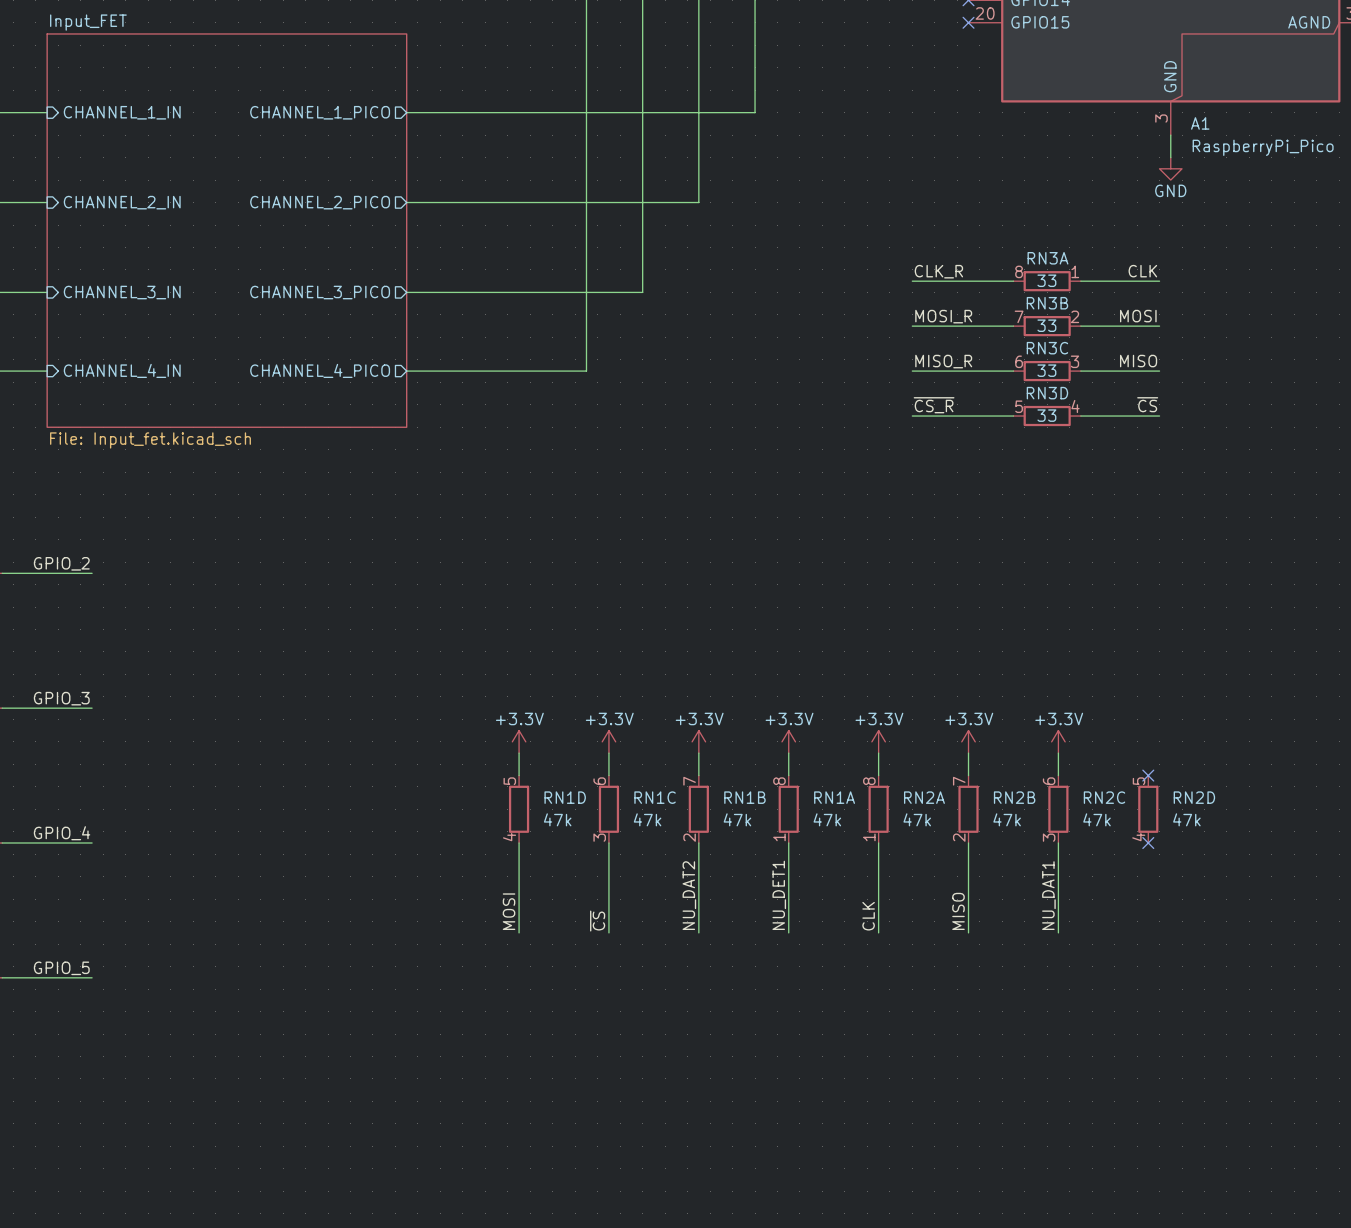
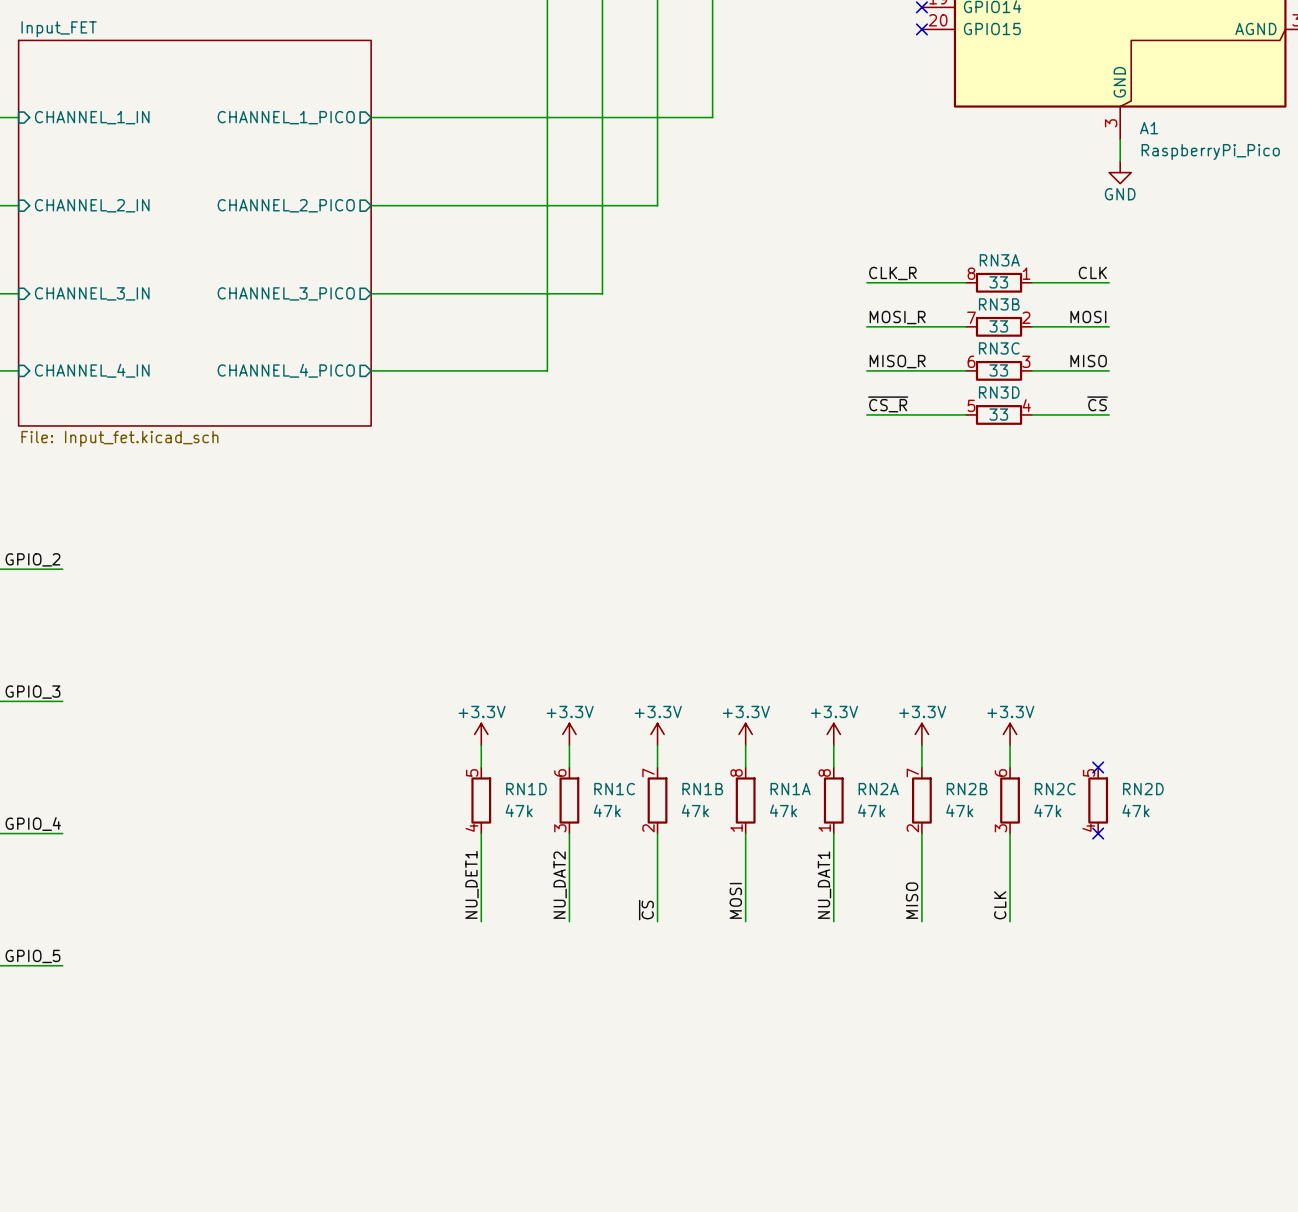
label: NU_DAT2 (689, 895) -> ~{CS} (646, 910)
label: NU_DET1 (779, 895) -> MOSI (735, 900)
label: NU_DAT1 (1048, 895) -> CLK (1000, 905)
label: MOSI (509, 911) -> NU_DET1 (471, 884)
label: CLK (868, 916) -> NU_DAT1 (824, 885)
label: ~{CS} (597, 921) -> NU_DAT2 (560, 885)

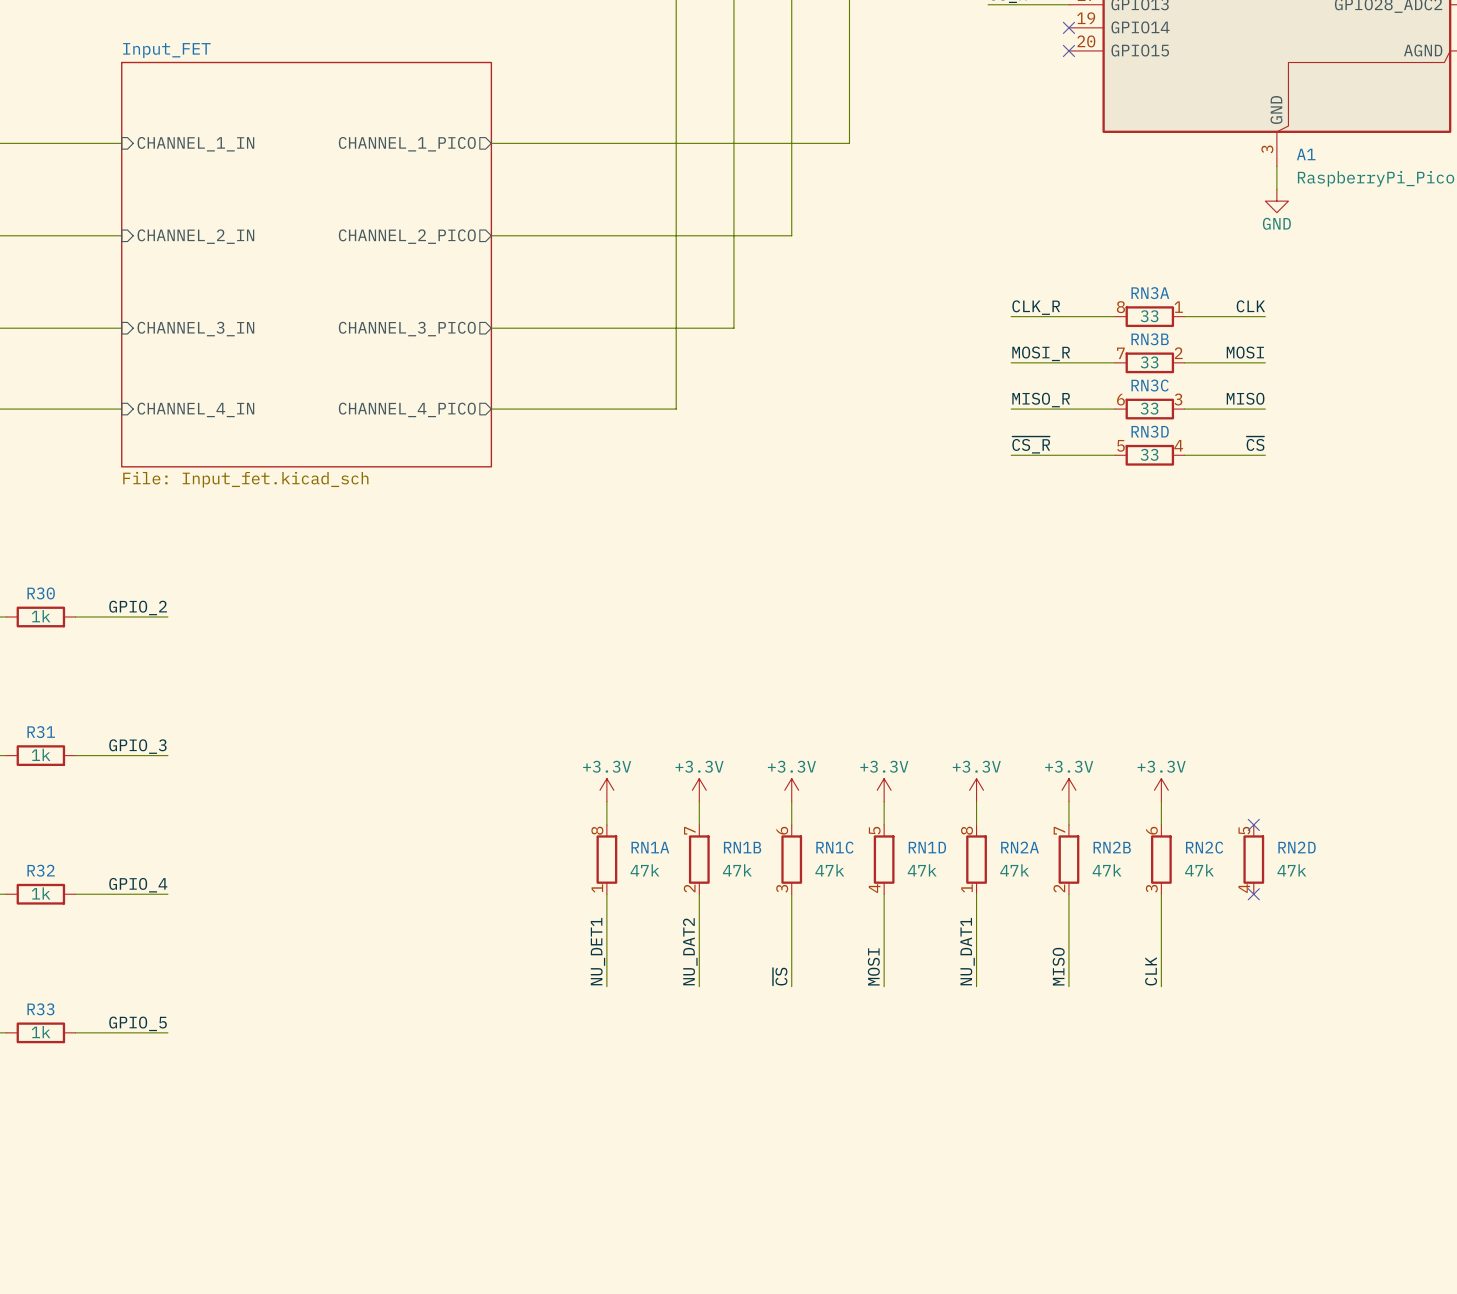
RN1D position: (481, 800) -> (884, 859)
RN1C position: (569, 800) -> (791, 859)
RN1B position: (657, 800) -> (699, 859)
RN1A position: (745, 800) -> (606, 859)

